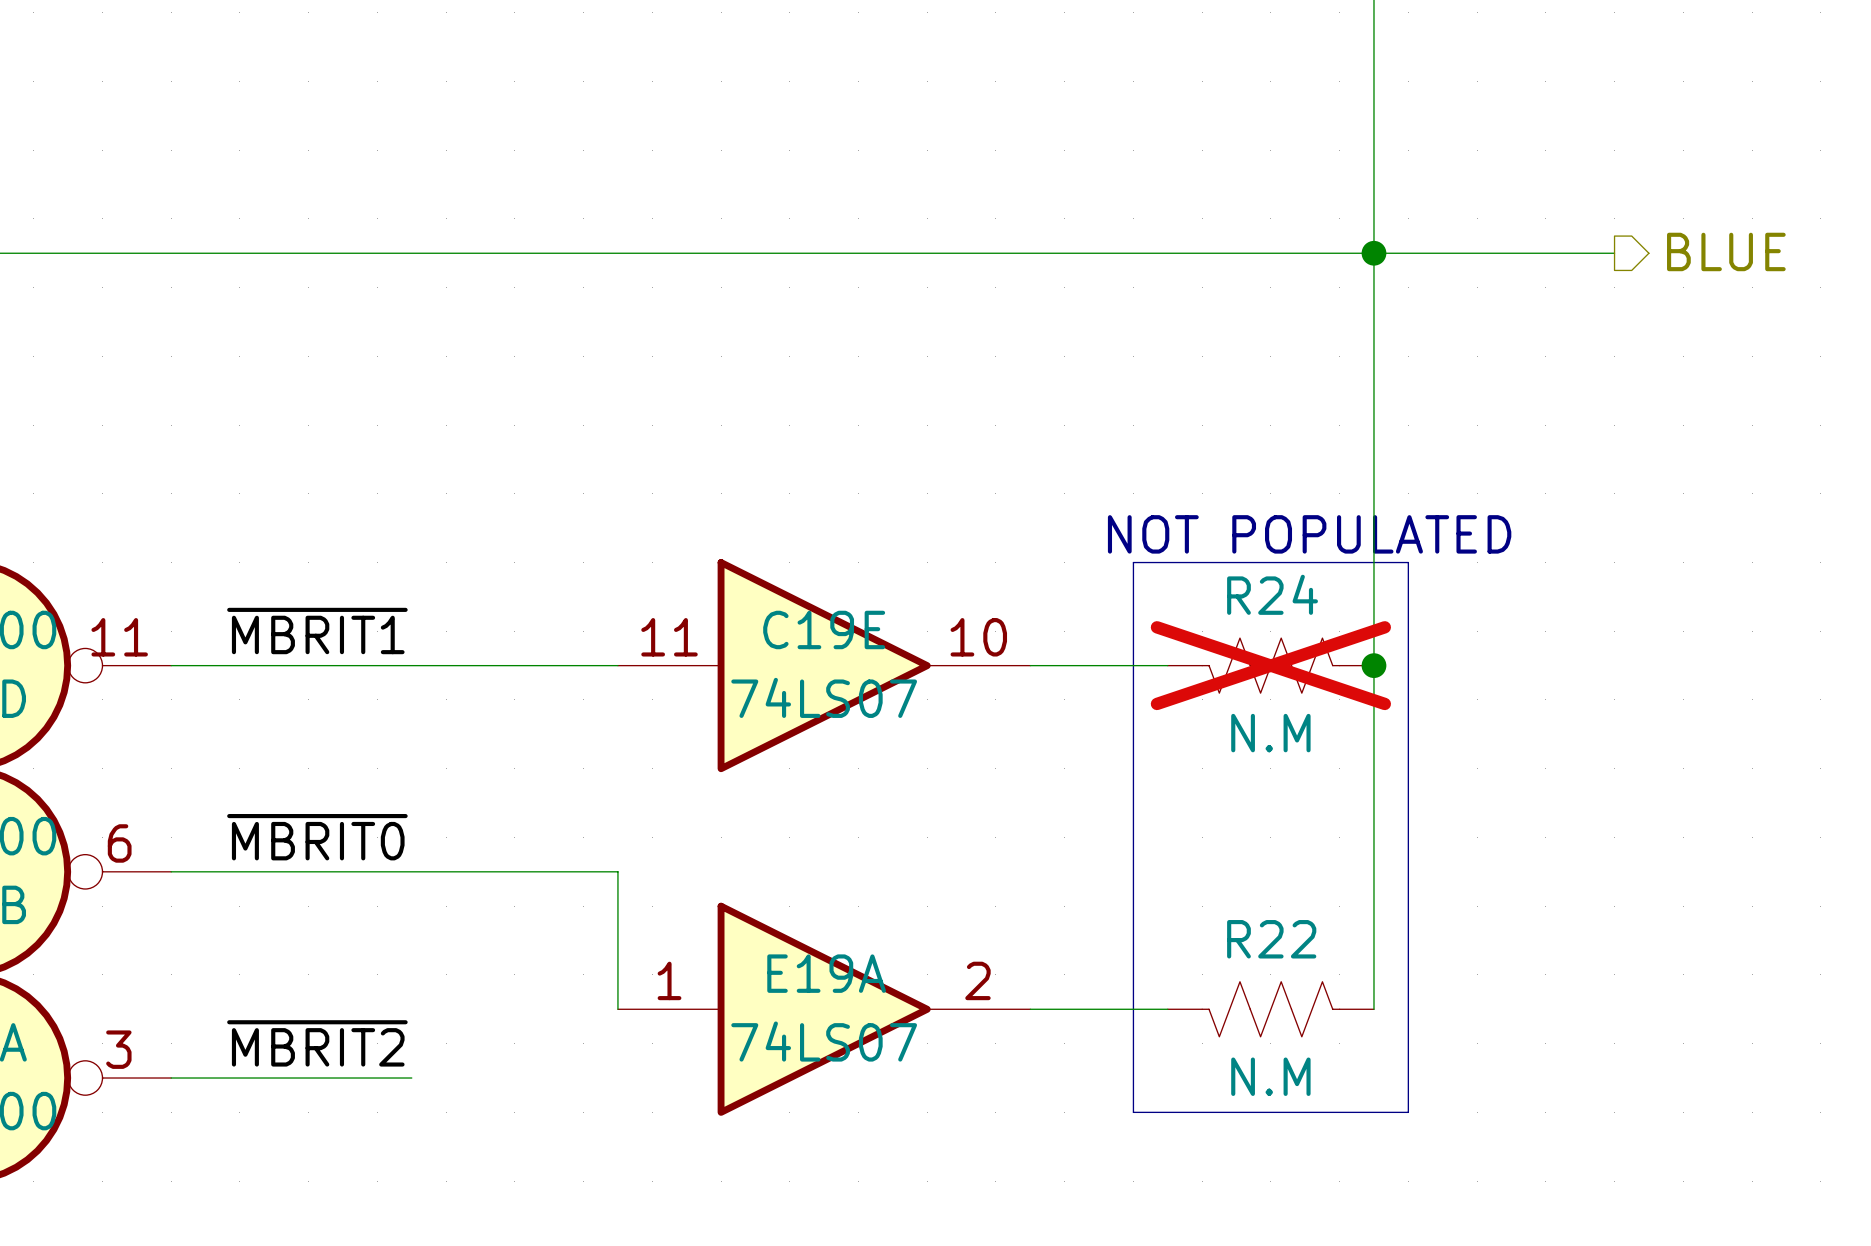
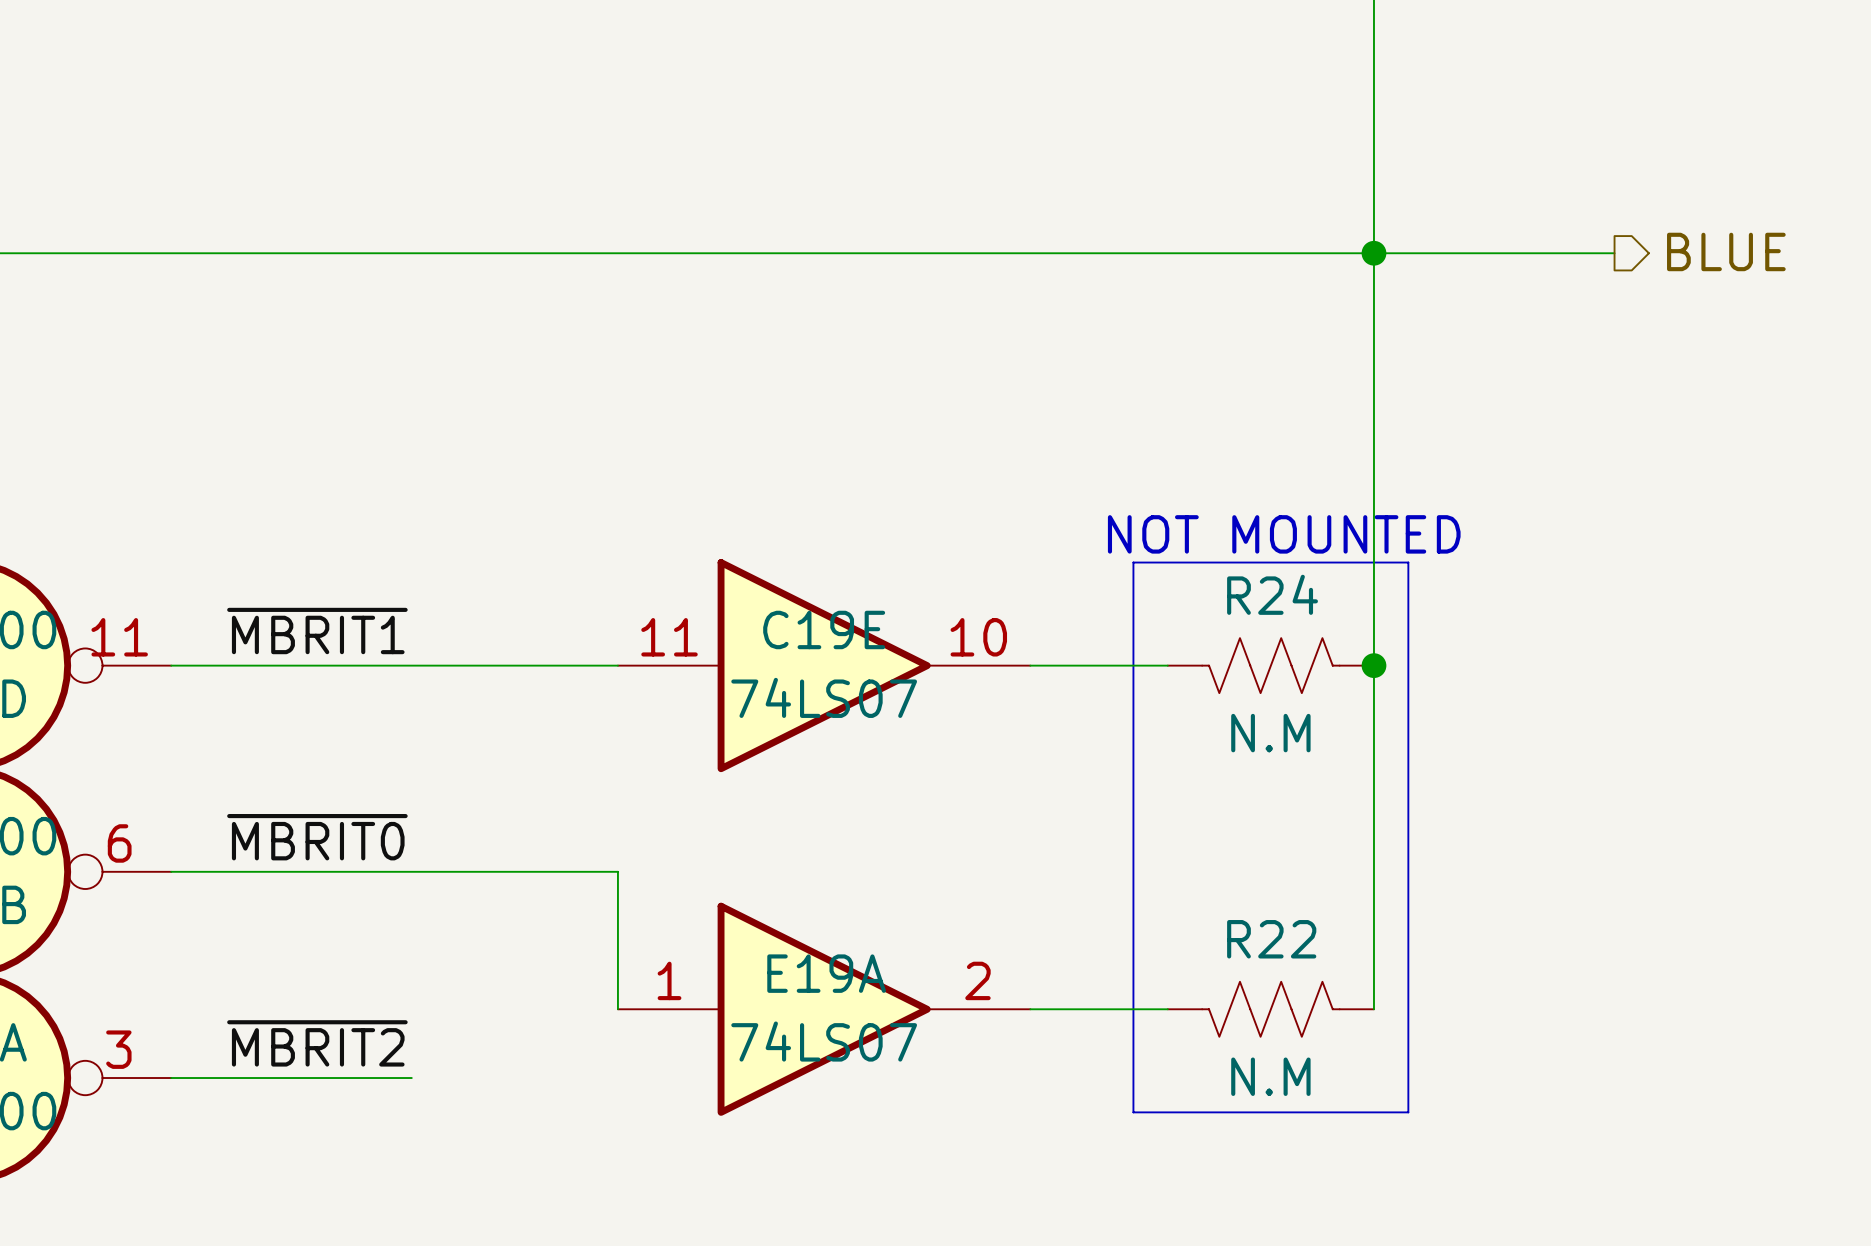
text: NOT POPULATED (1309, 534) -> NOT MOUNTED (1284, 534)
R24 do-not-place cross: (1270, 665) -> none

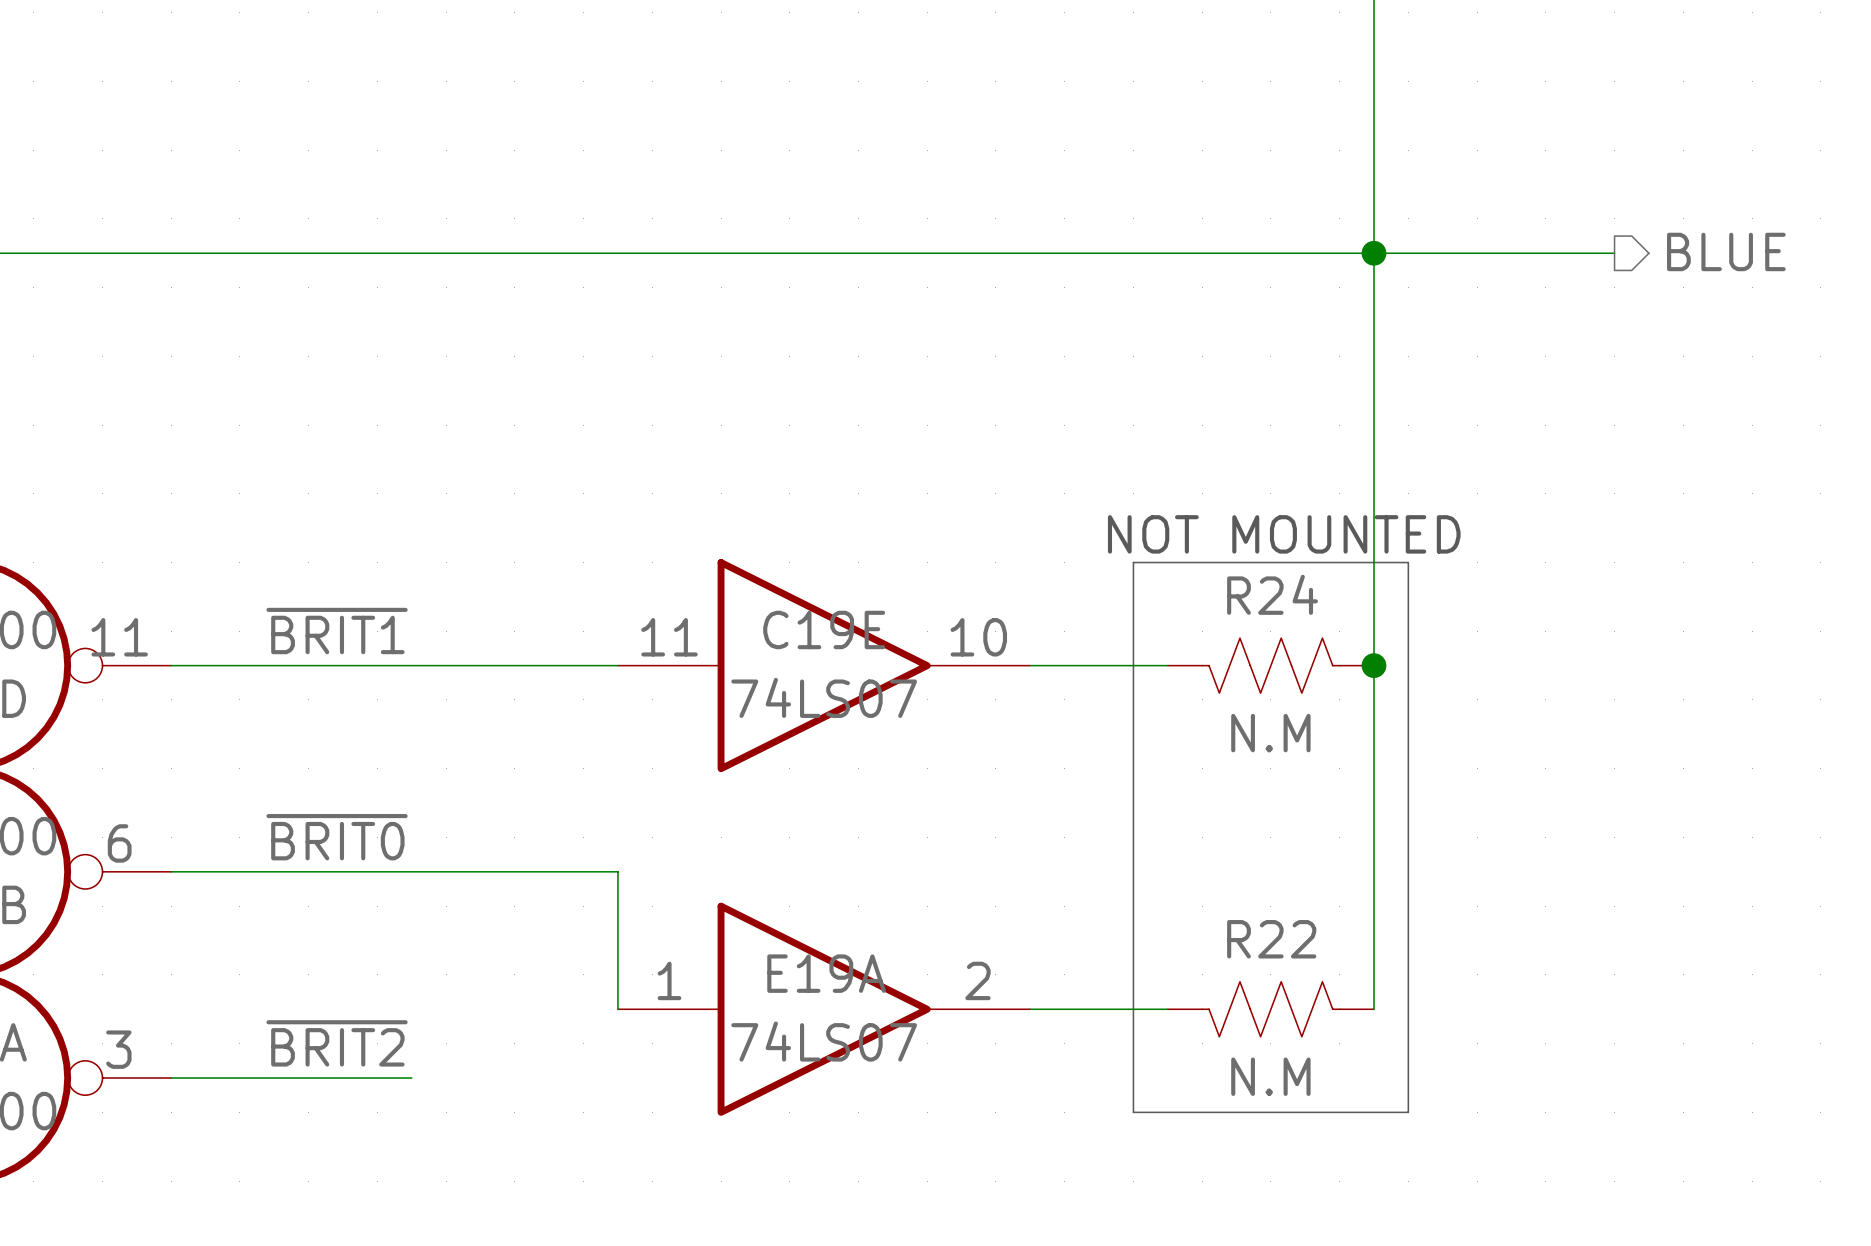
label: ~{MBRIT1} (317, 631) -> ~{BRIT1} (337, 631)
label: ~{MBRIT0} (317, 837) -> ~{BRIT0} (337, 837)
label: ~{MBRIT2} (317, 1043) -> ~{BRIT2} (337, 1043)

